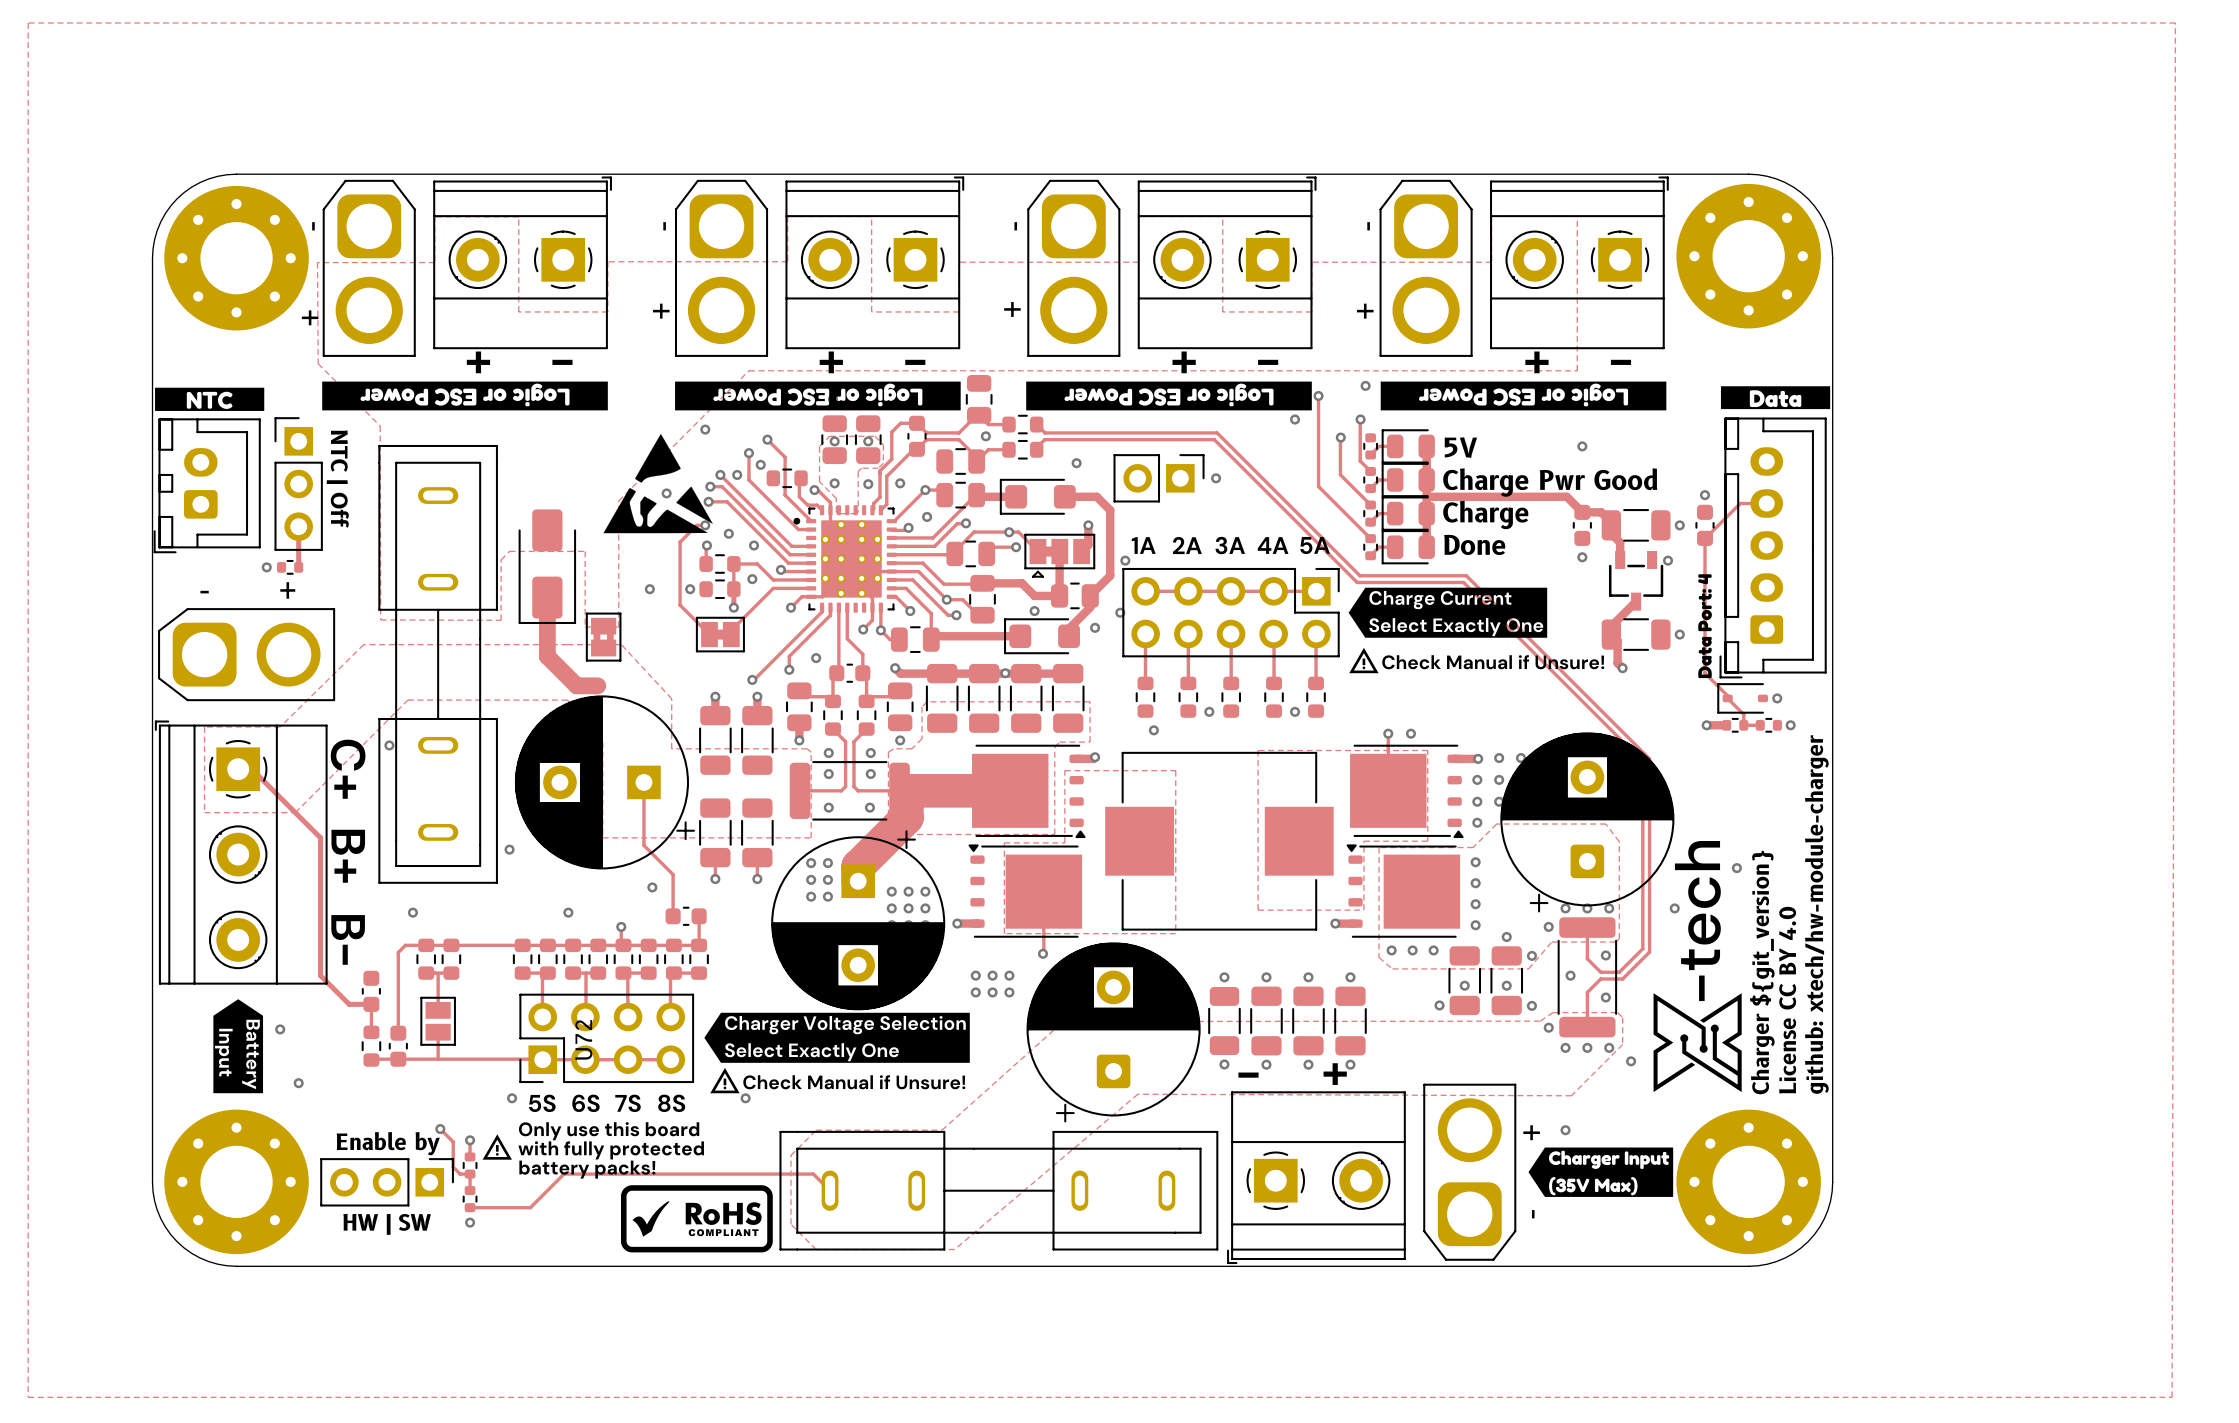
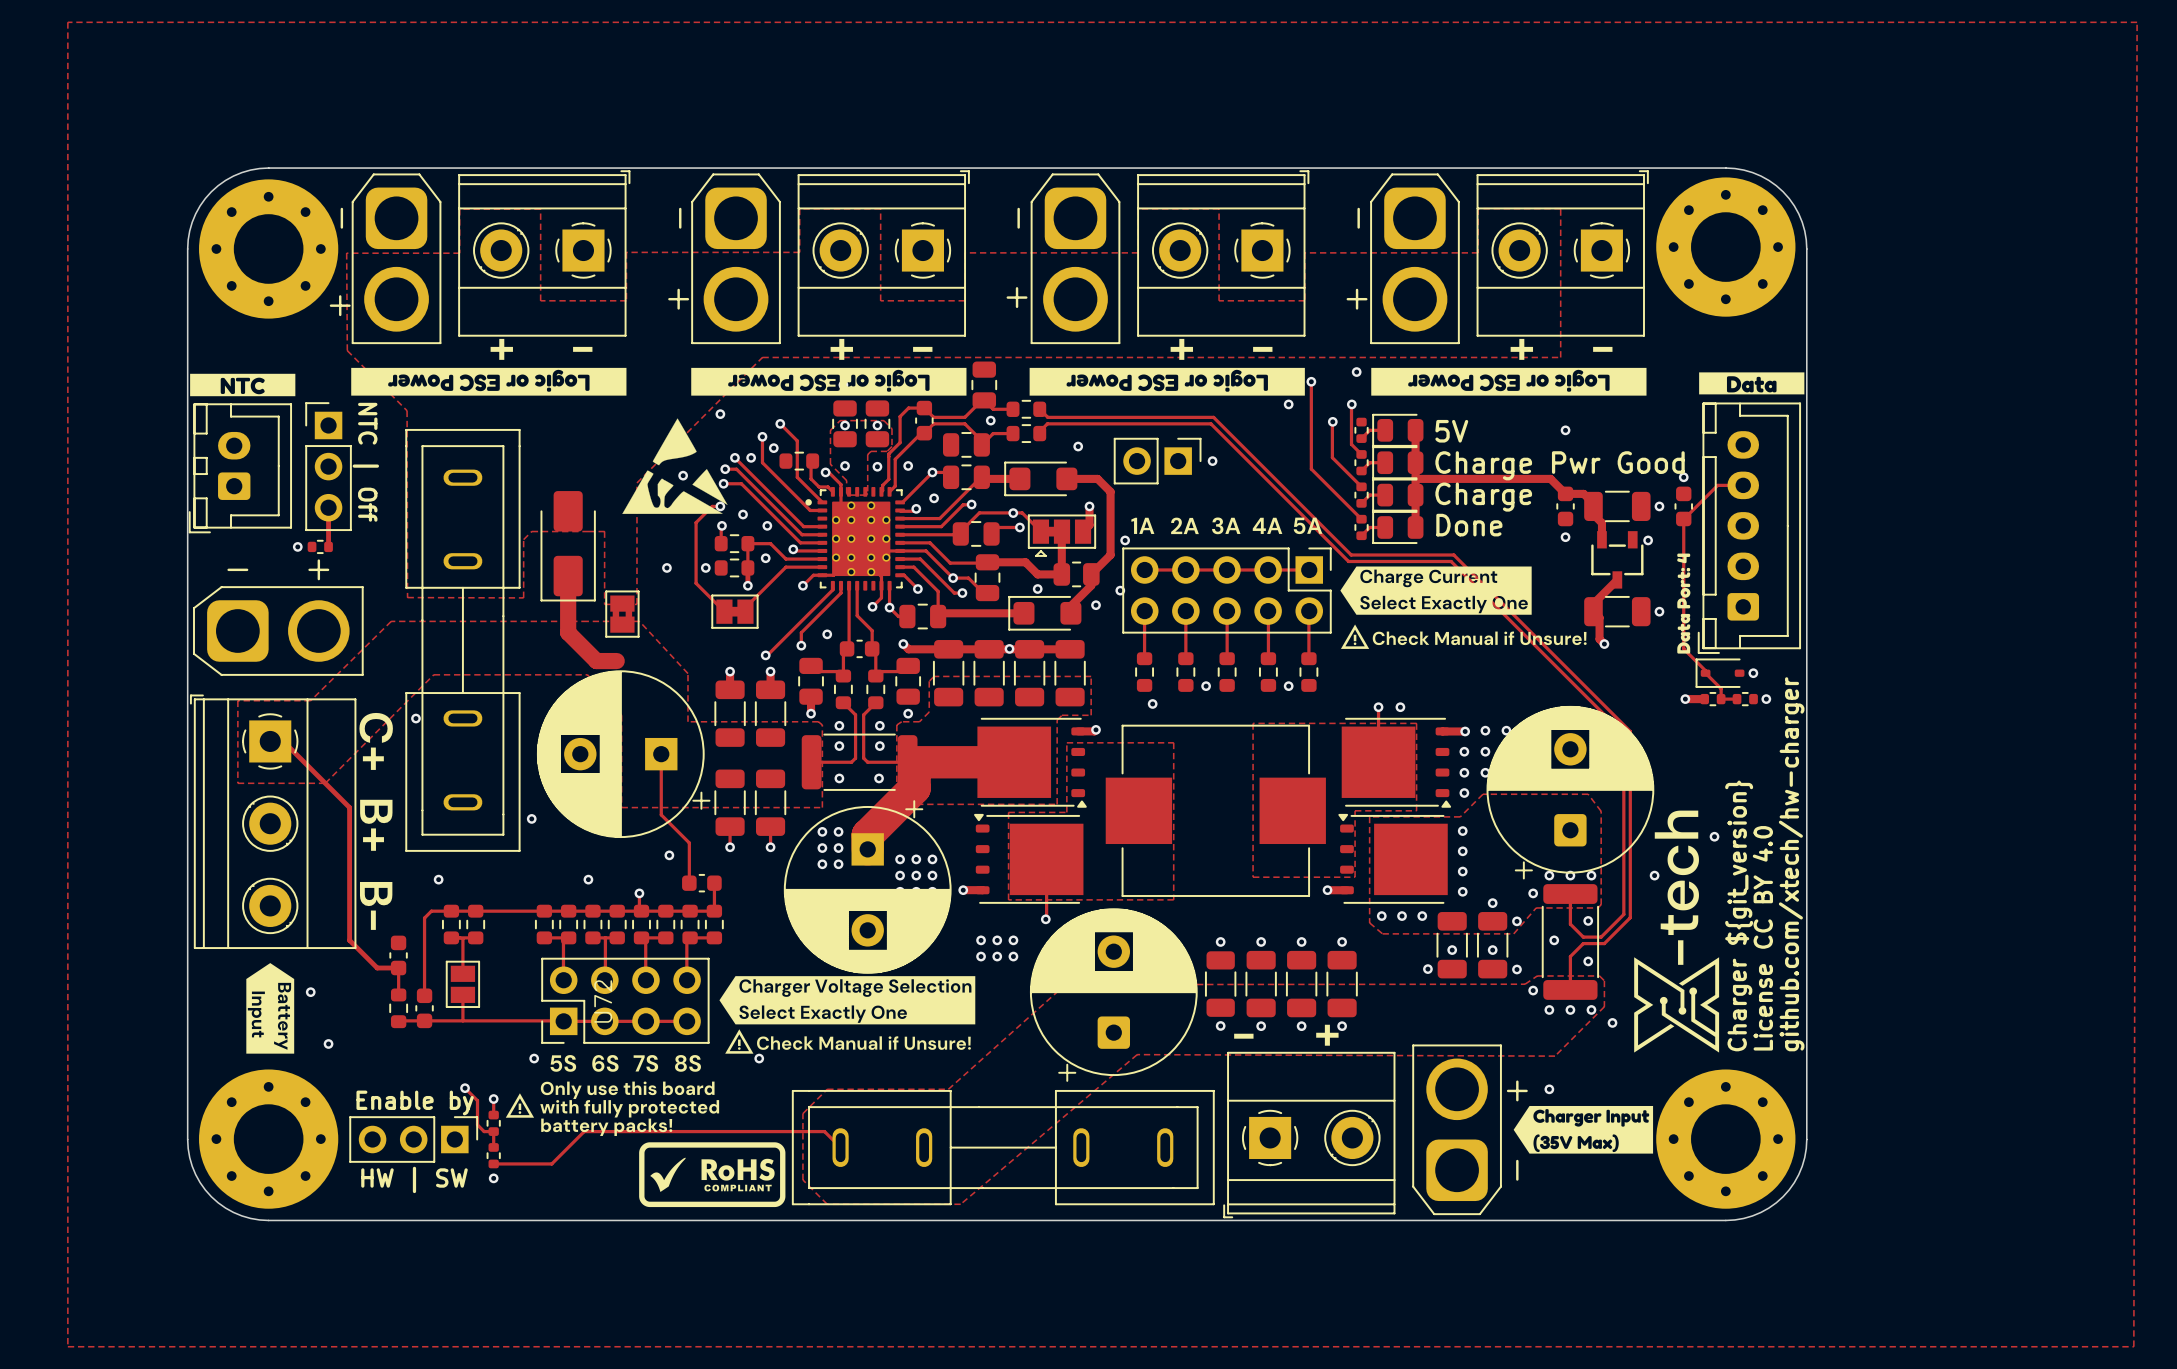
text: github: xtech/hw-module-charger (1816, 914) -> github.com/xtech/hw-charger (1791, 864)

